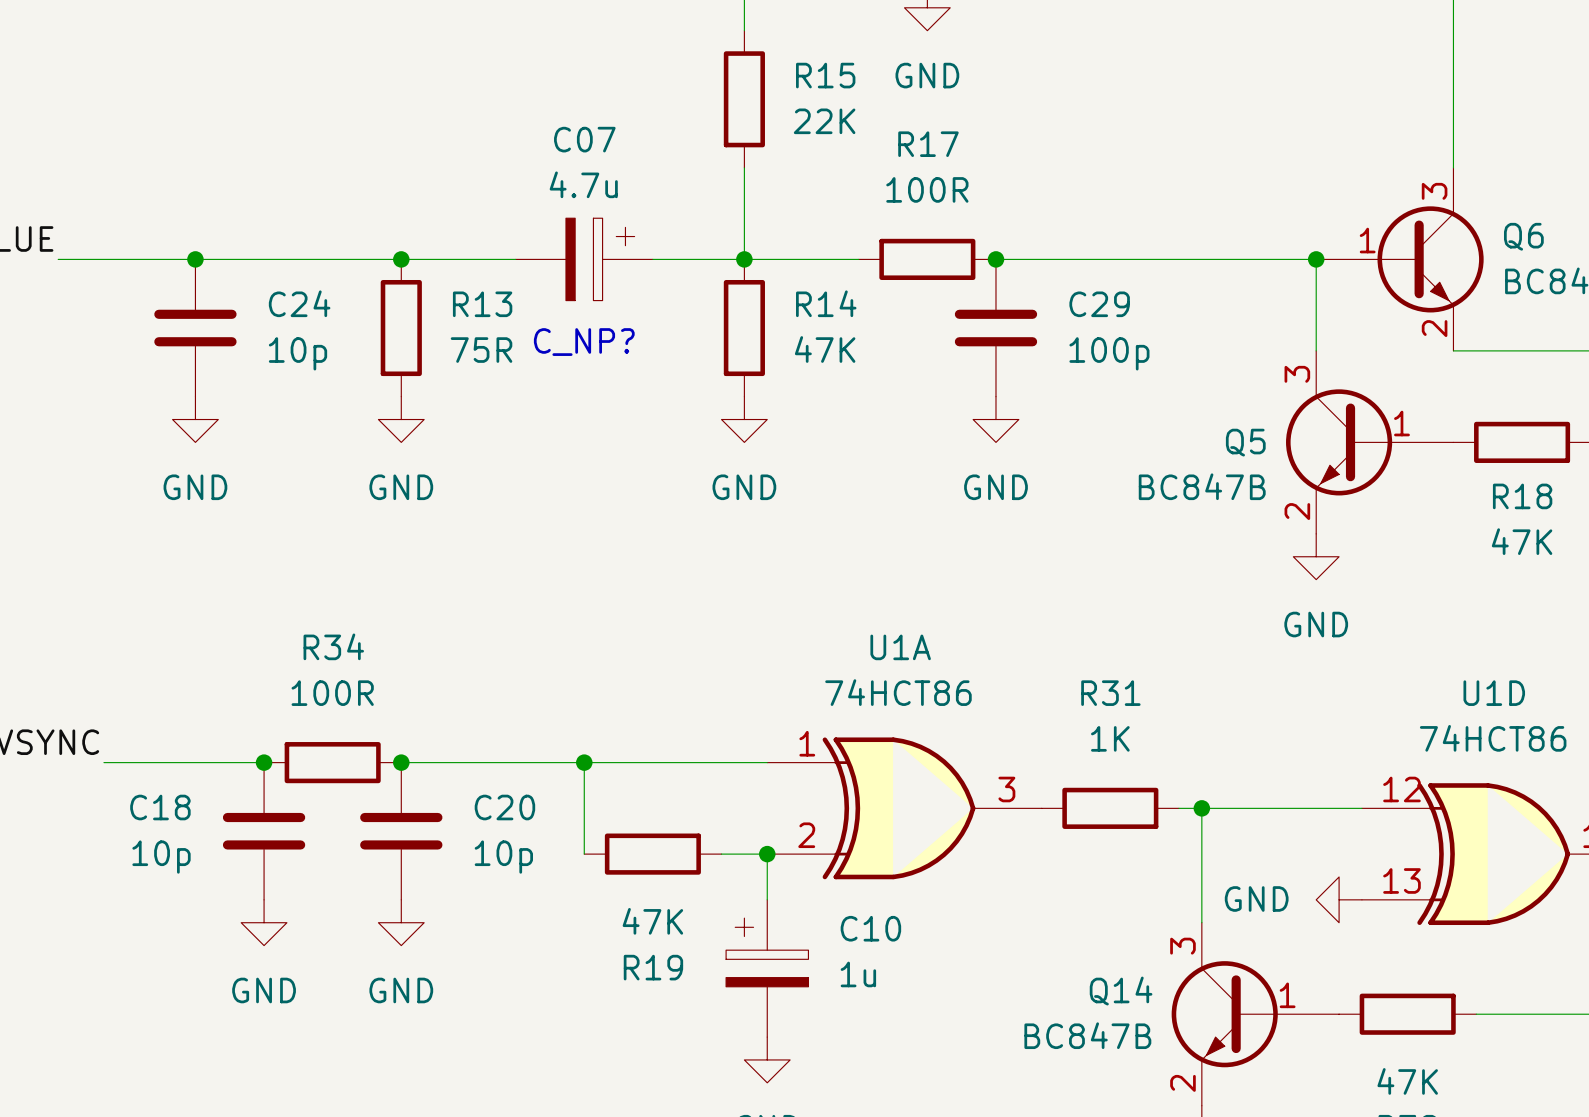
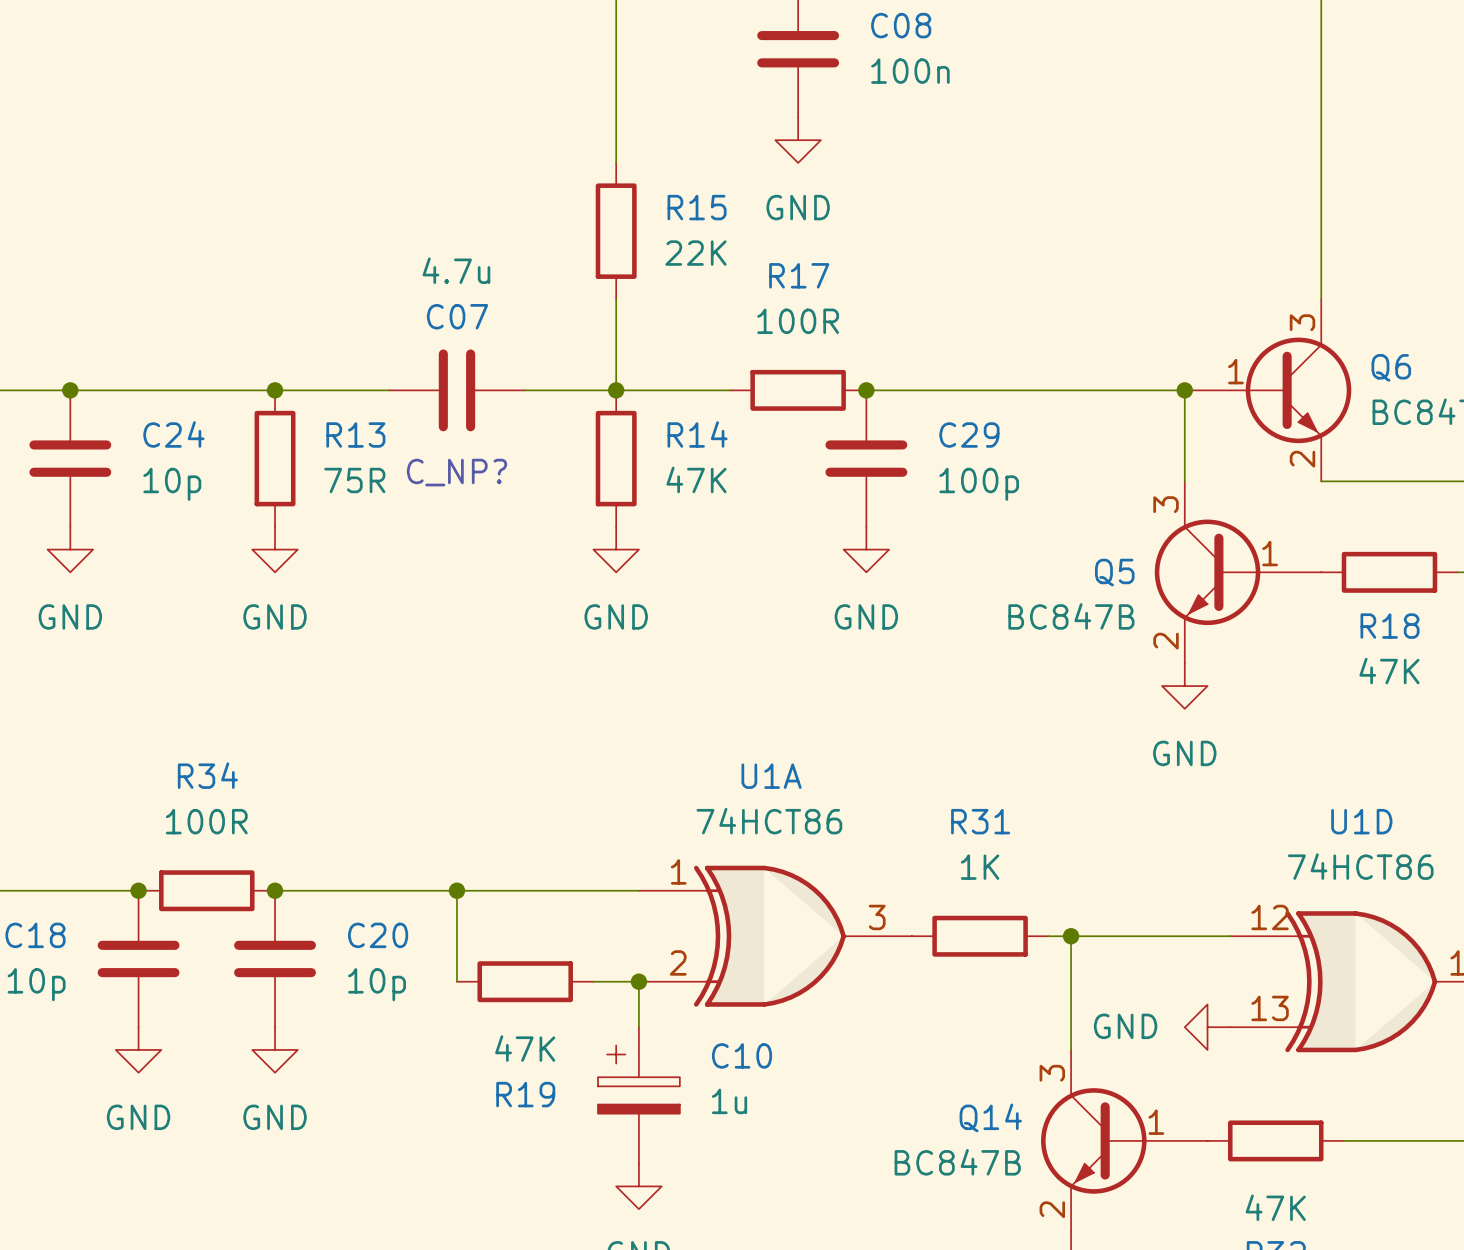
C07 name position: C07 (584, 139) -> C07 (457, 316)
C07 value position: 4.7u (583, 184) -> 4.7u (456, 270)
C07 symbol: [515, 218, 653, 301] -> [388, 349, 526, 432]

